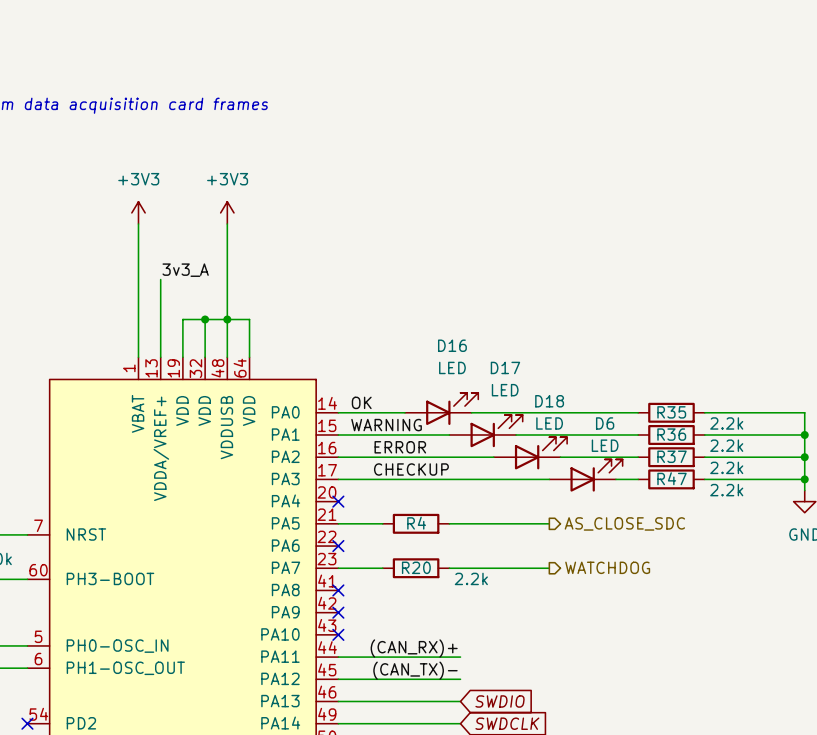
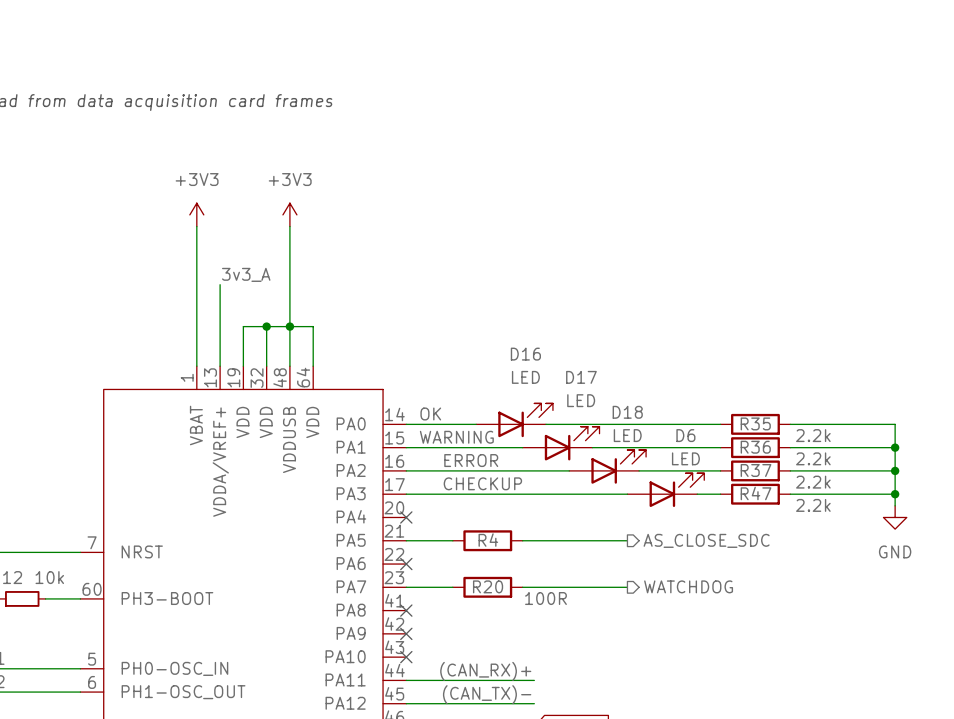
R20 value: 2.2k (471, 578) -> 100R (545, 598)

